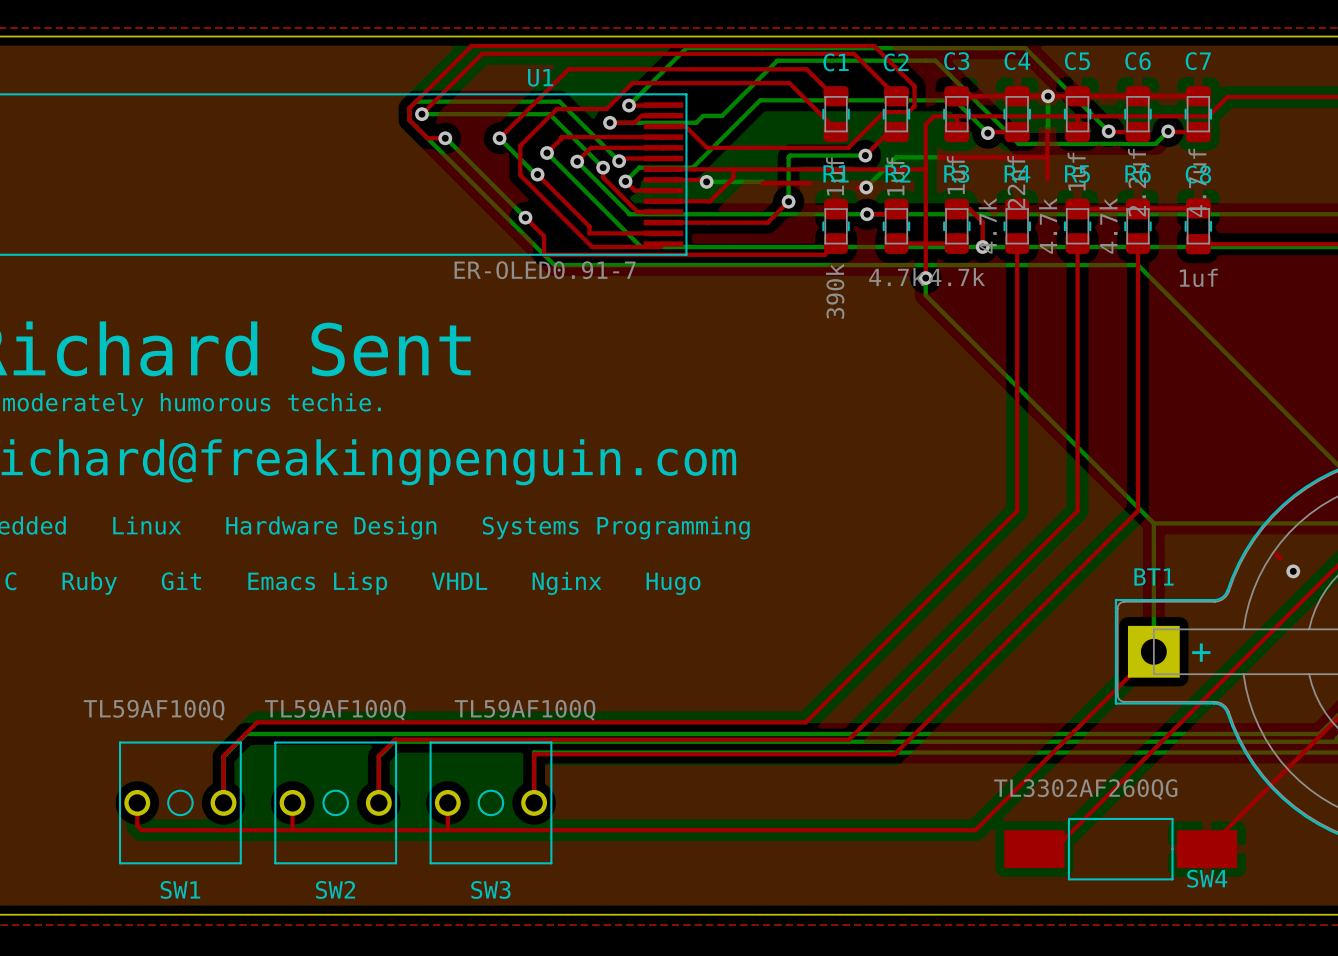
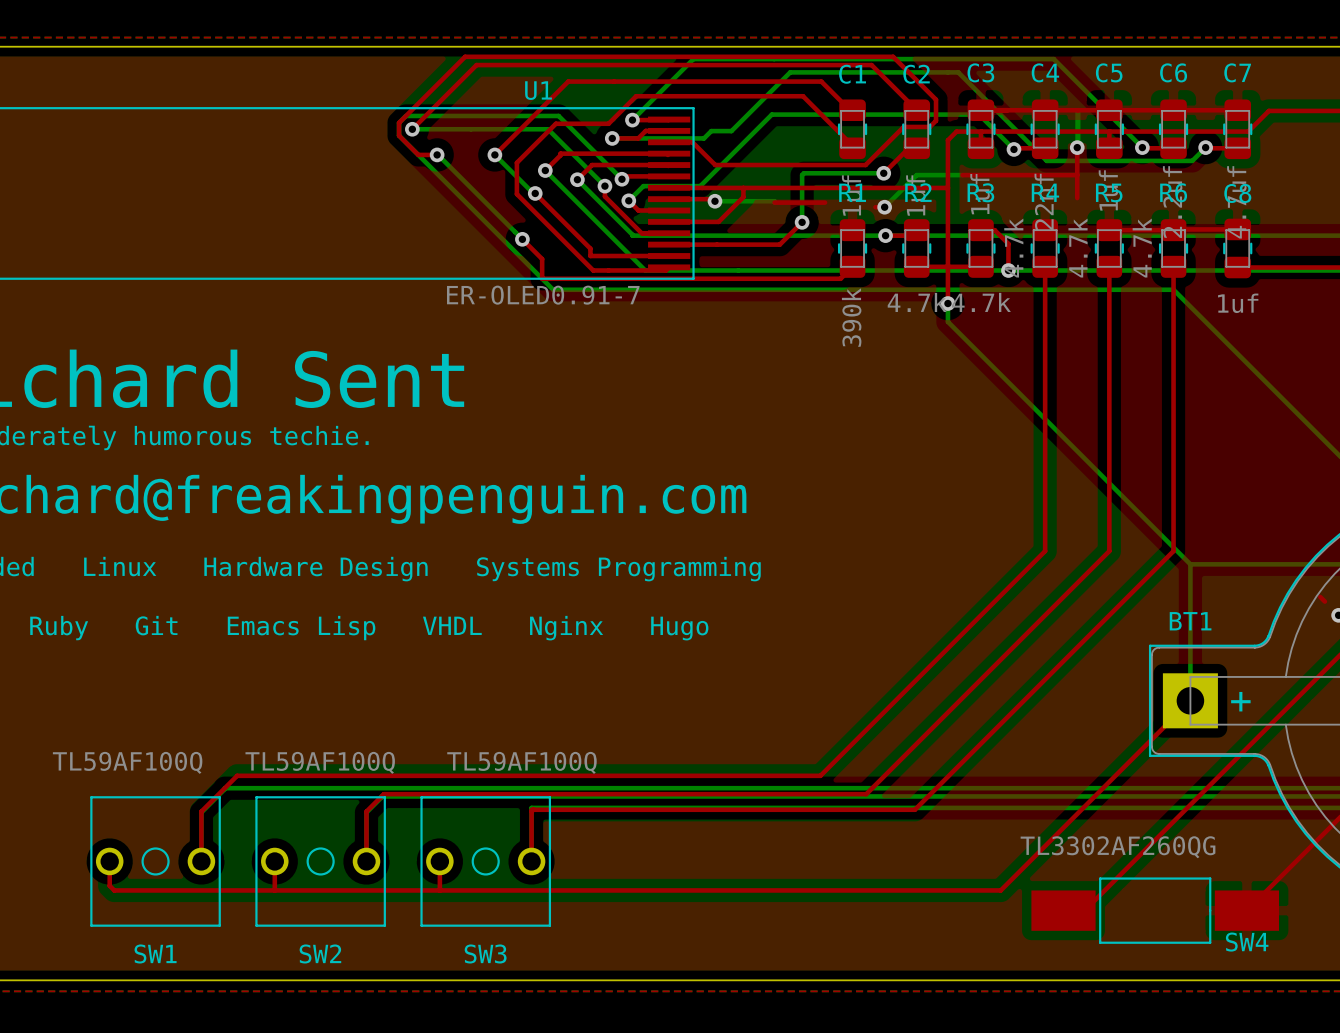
via position: (1048, 96) -> (1077, 147)

